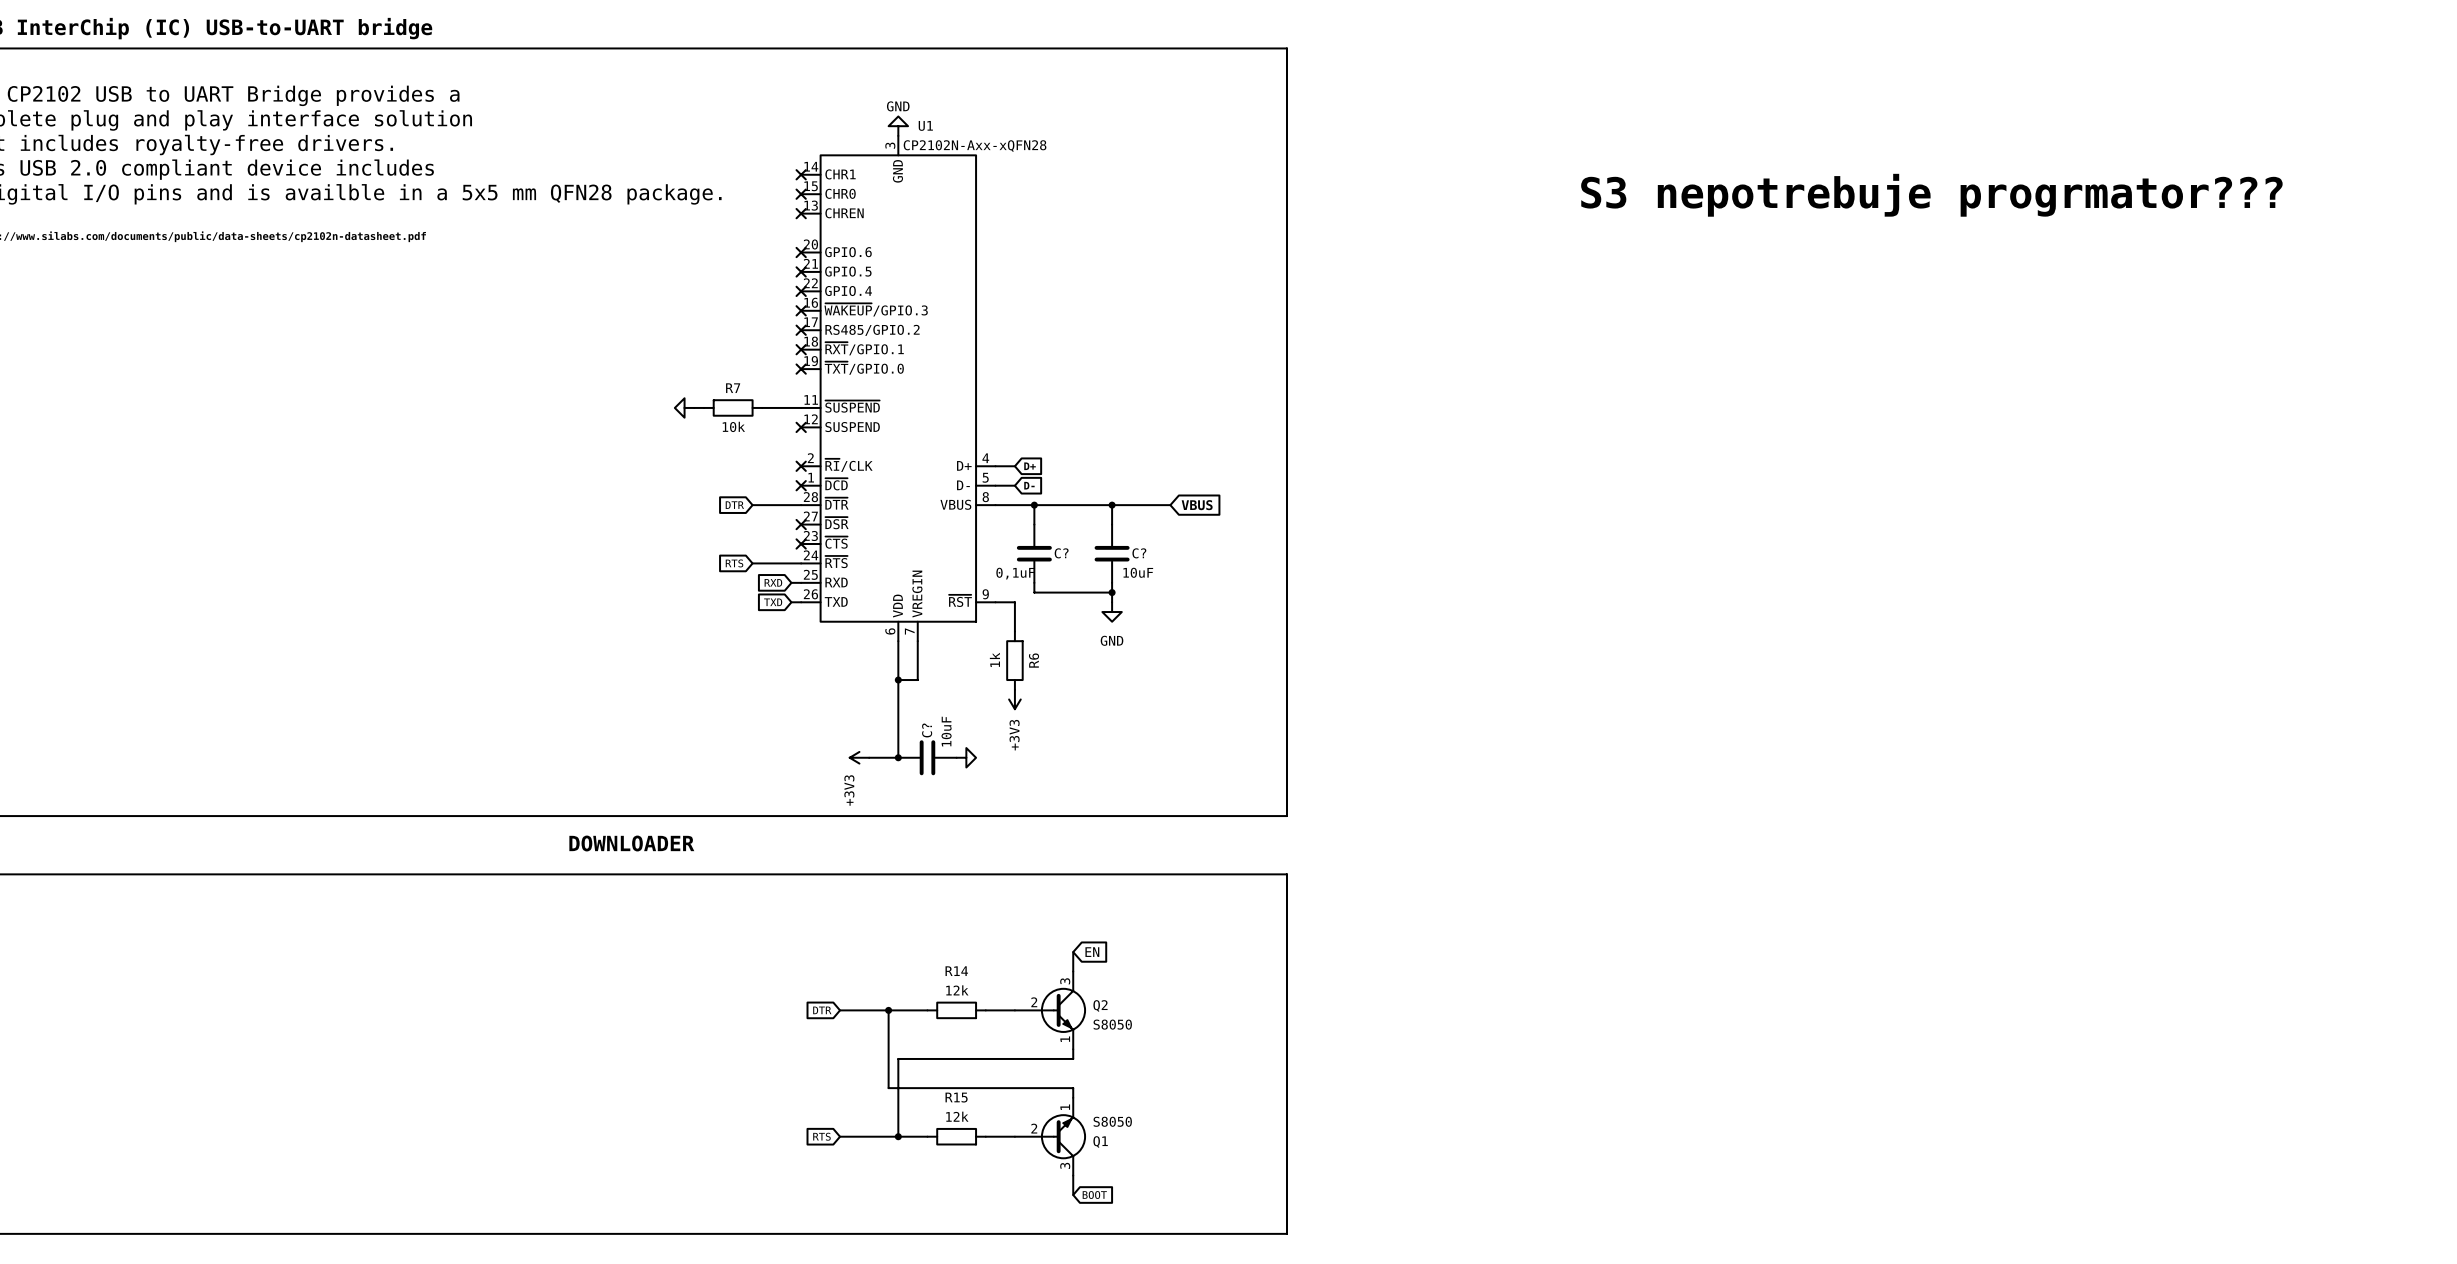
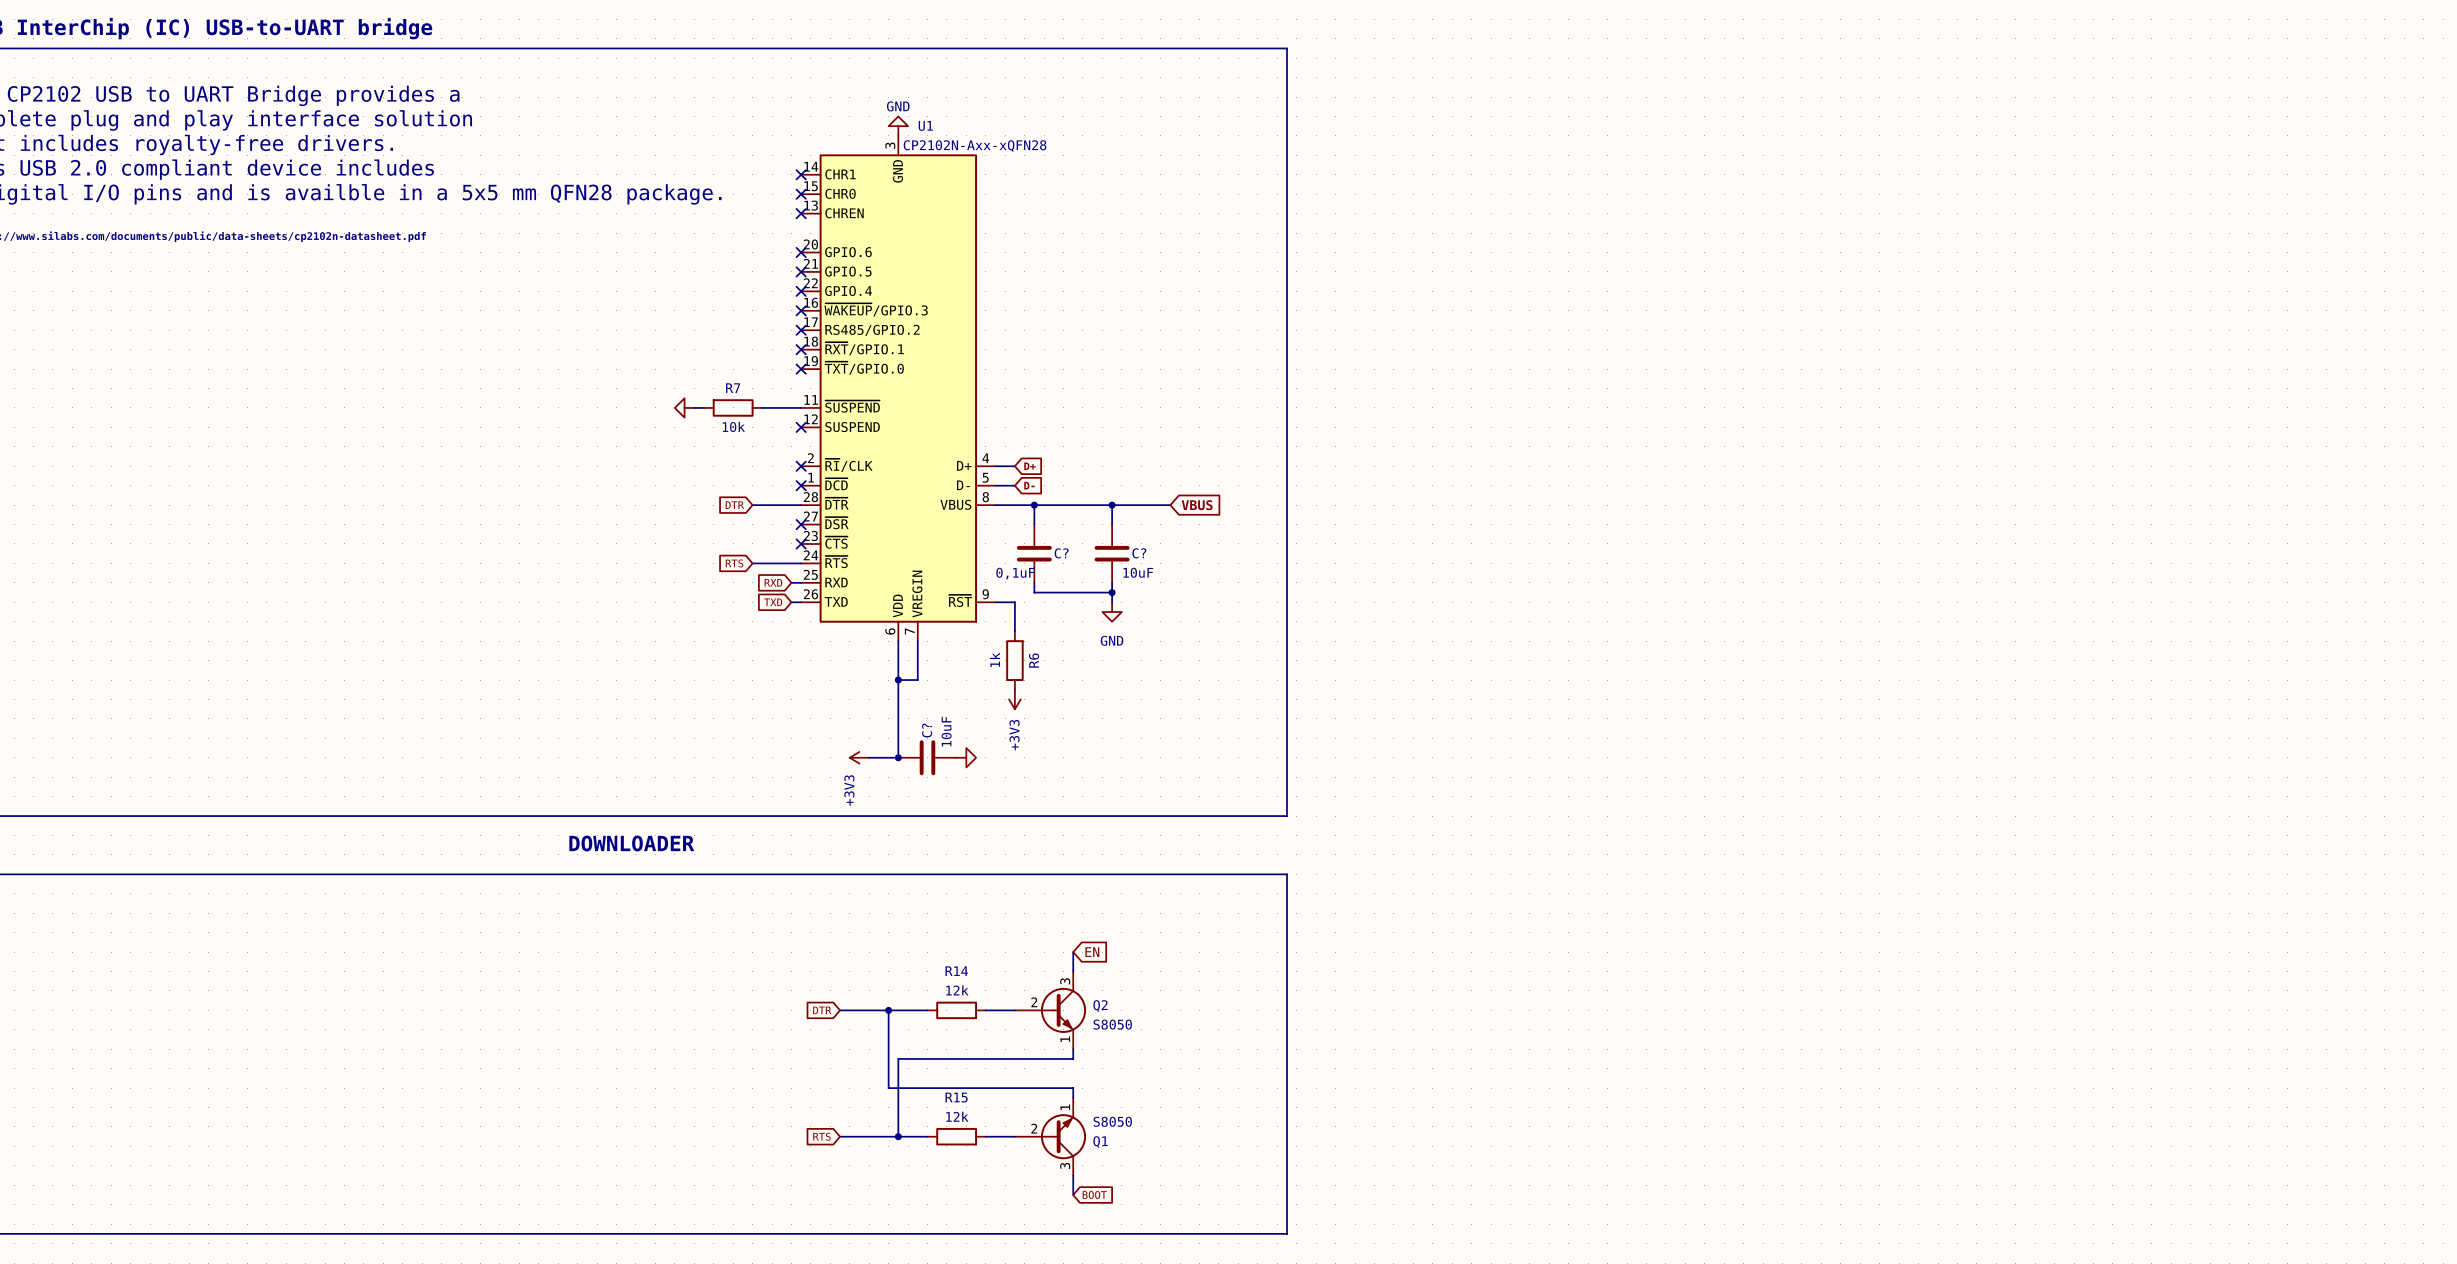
text: S3 nepotrebuje progrmator??? (1931, 195) -> none

